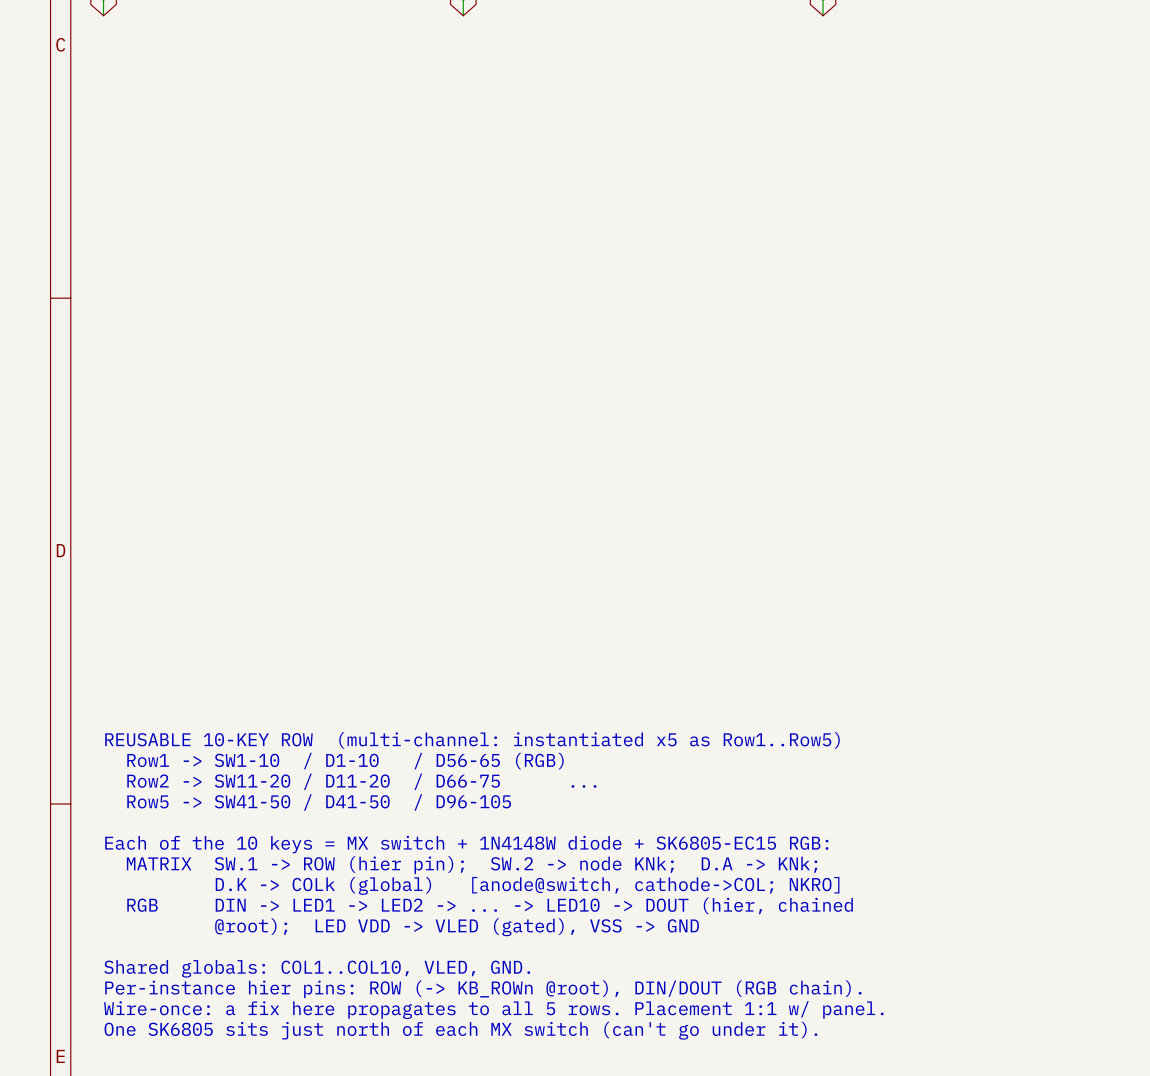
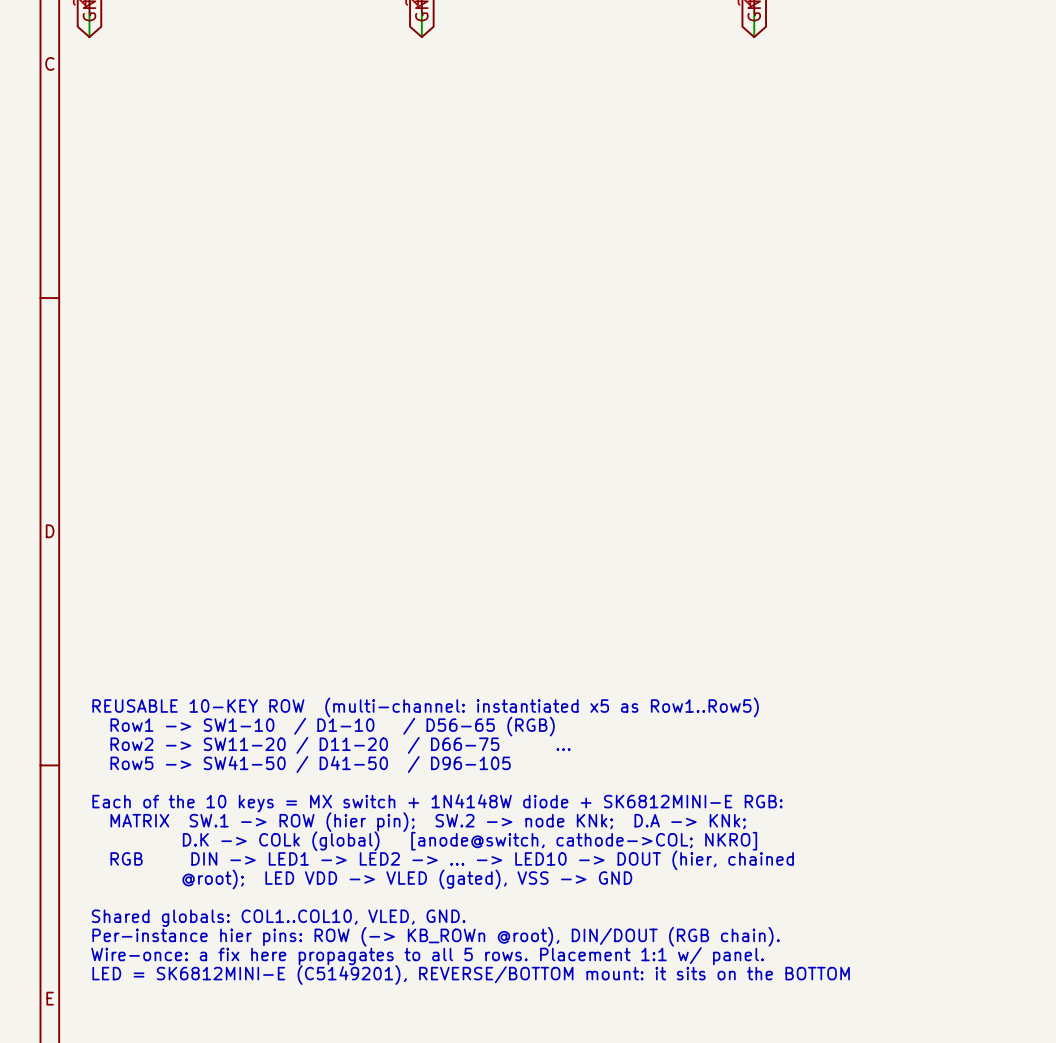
text: Each of the 10 keys = MX switch + 1N4148W diode + SK6805-EC15 RGB: (466, 844) -> Each of the 10 keys = MX switch + 1N4148W diode + SK6812MINI-E RGB: (437, 803)
text: One SK6805 sits just north of each MX switch (can't go under it). (460, 1030) -> LED = SK6812MINI-E (C5149201), REVERSE/BOTTOM mount: it sits on the BOTTOM (471, 975)

